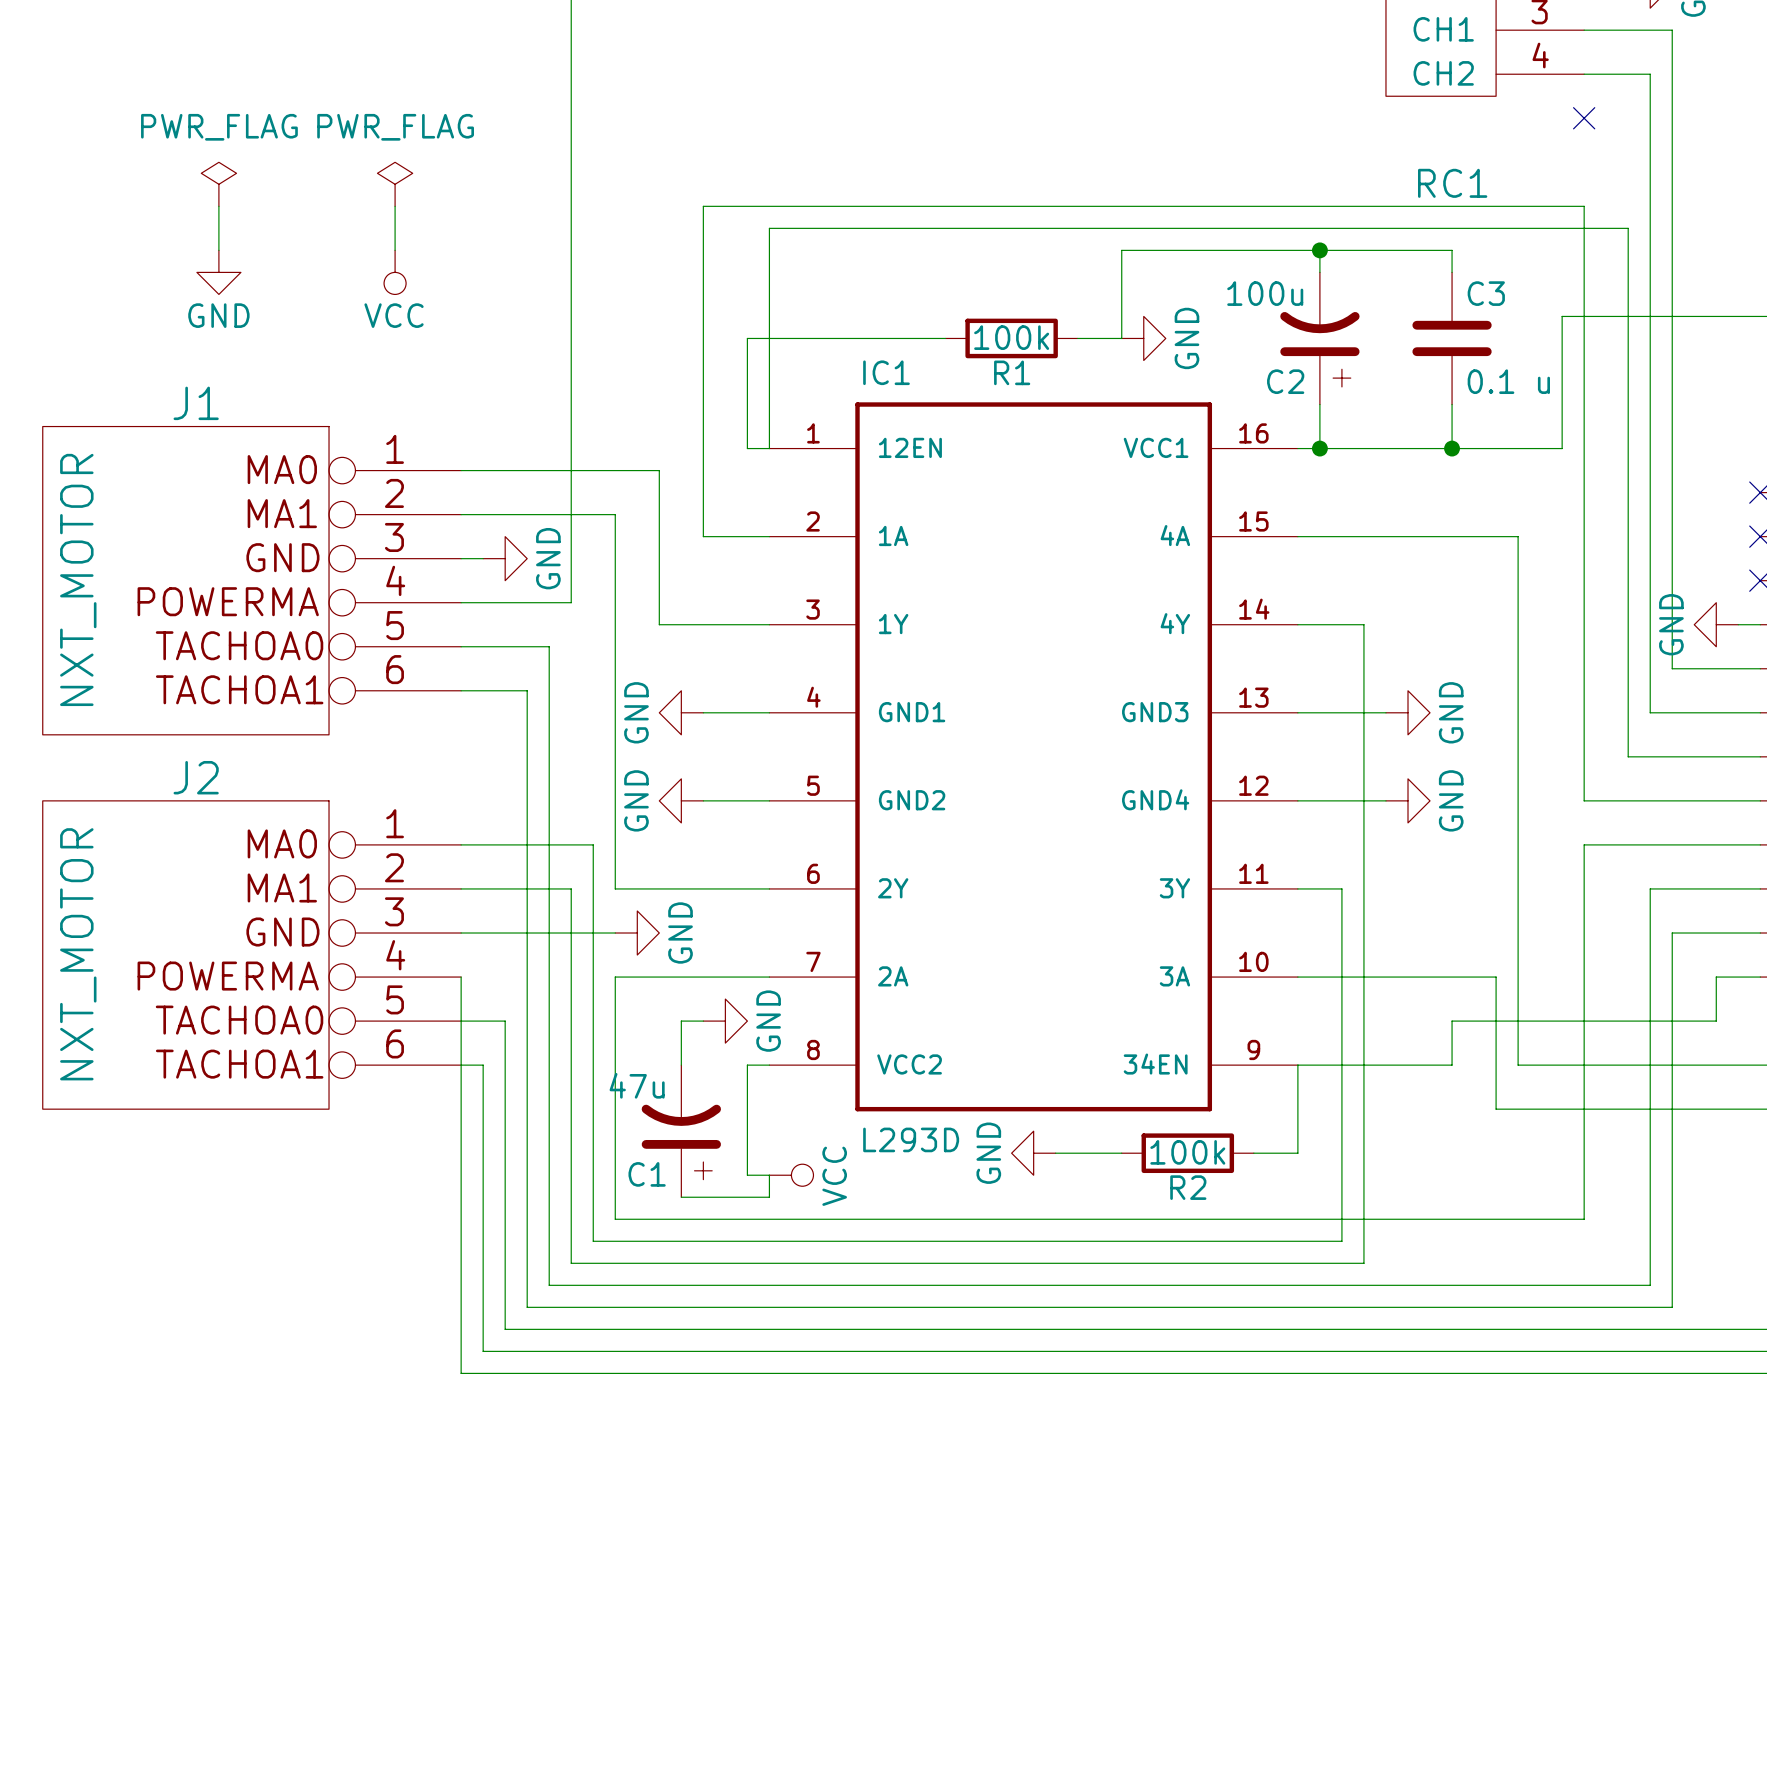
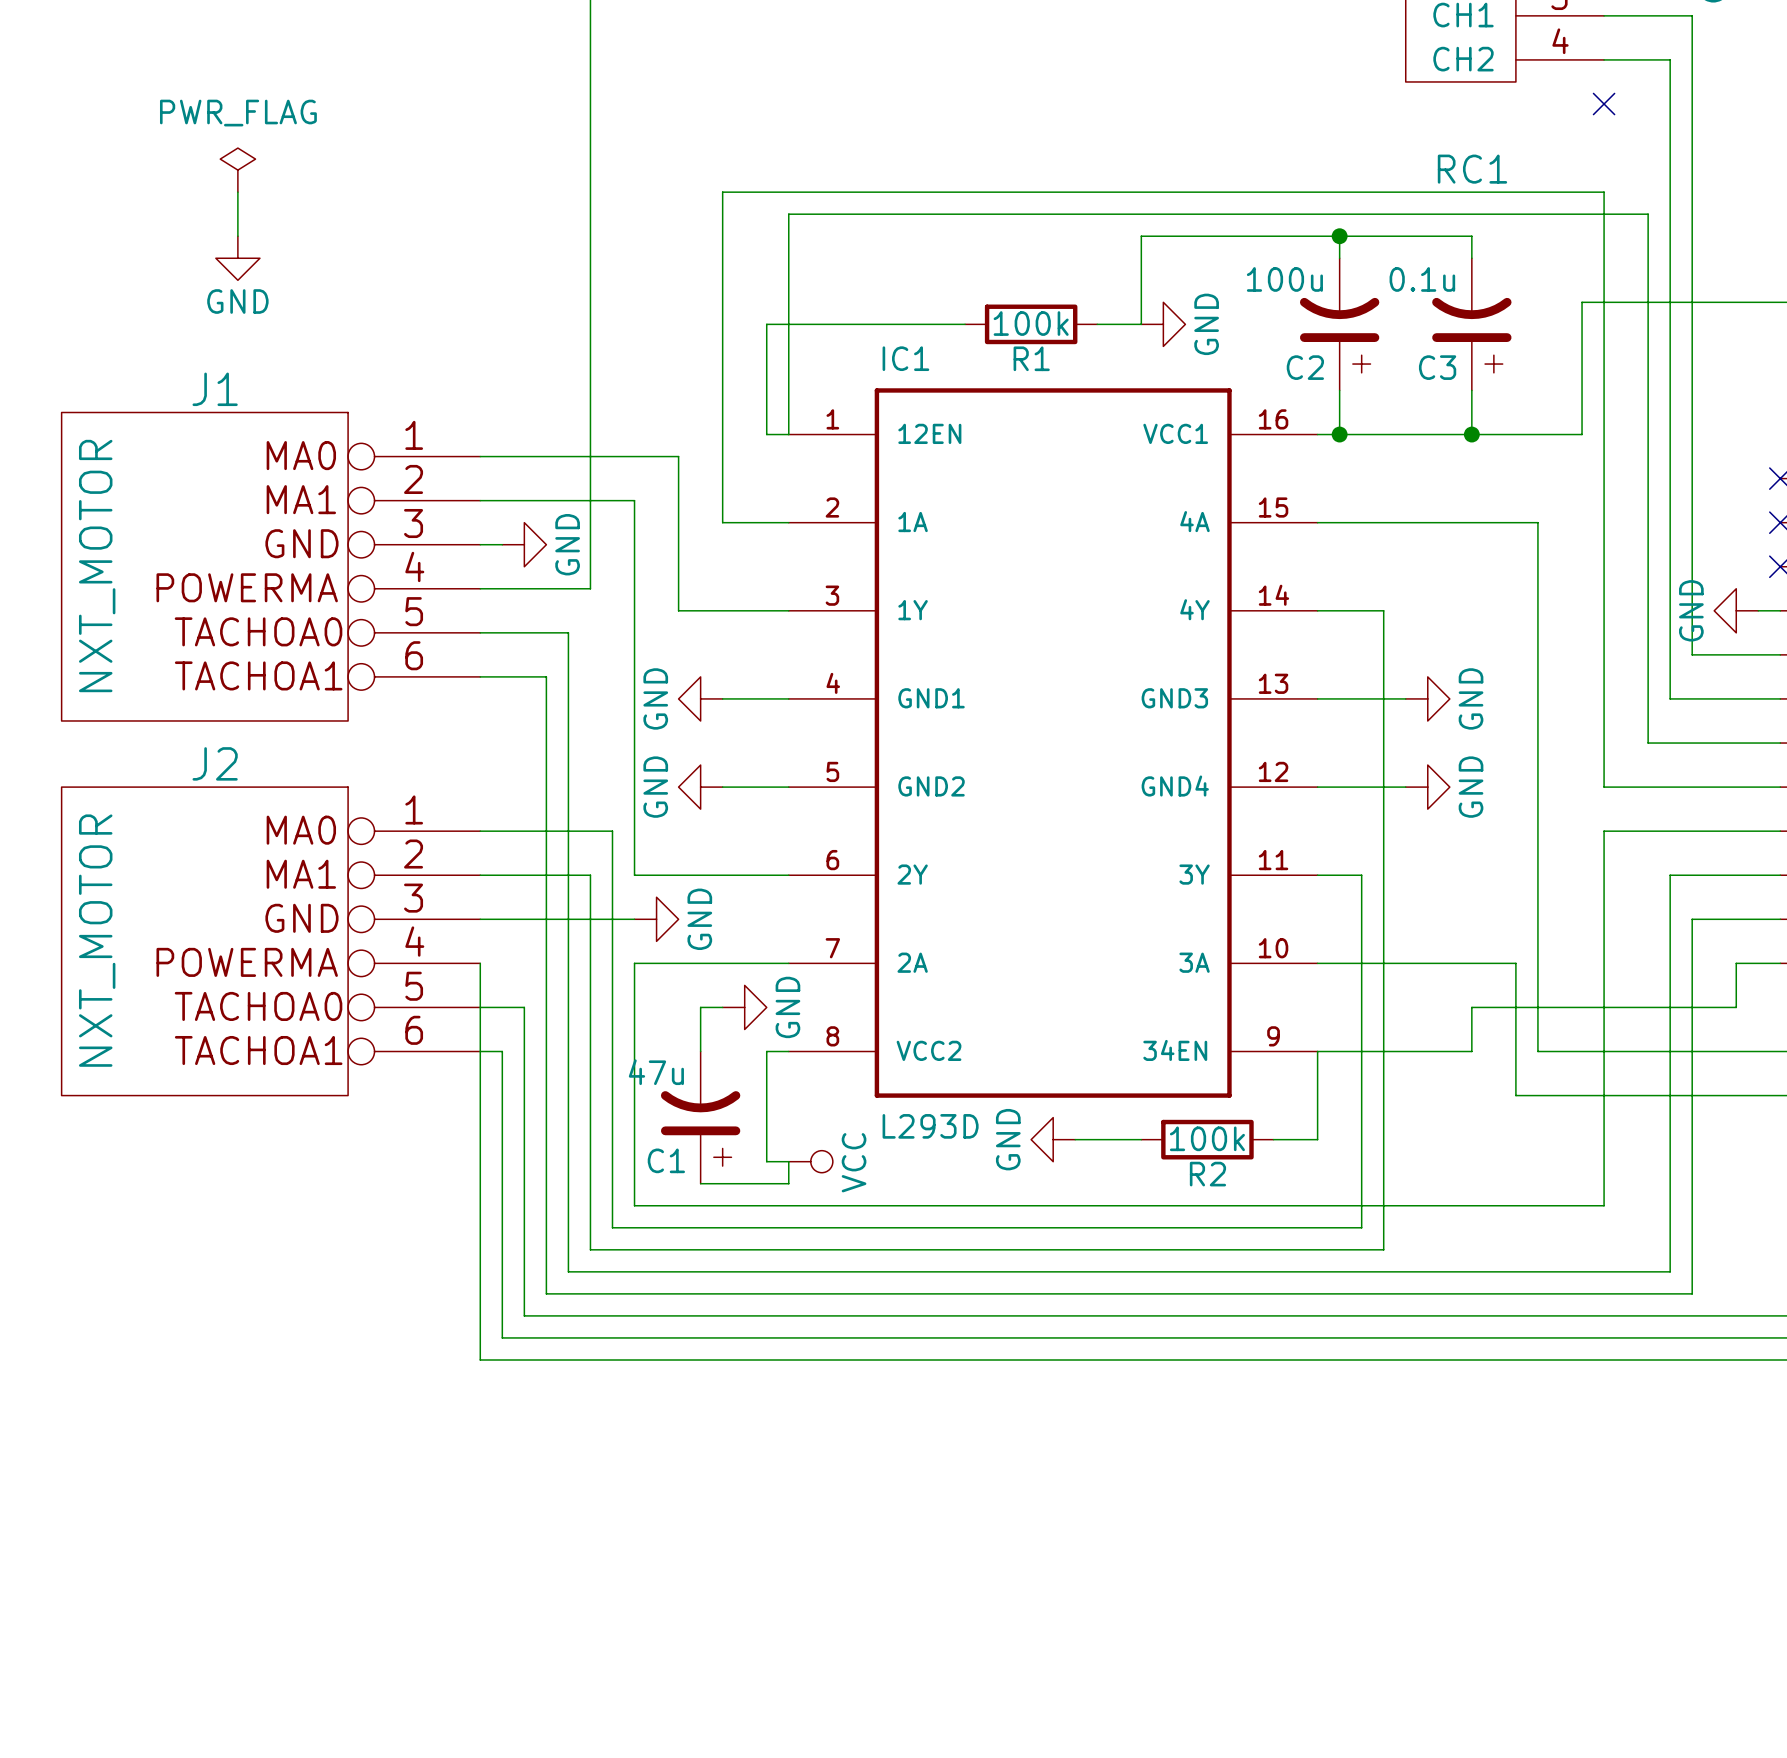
power symbol: PWR_FLAG (395, 184) -> none
wire: (395, 206) (395, 250) -> none
power symbol: VCC (395, 272) -> none
C3 symbol: [1412, 272, 1492, 405] -> [1432, 258, 1512, 391]
C3 name position: C3 (1486, 293) -> C3 (1437, 367)
C3 value: 0.1 u (1508, 381) -> 0.1u (1422, 279)

